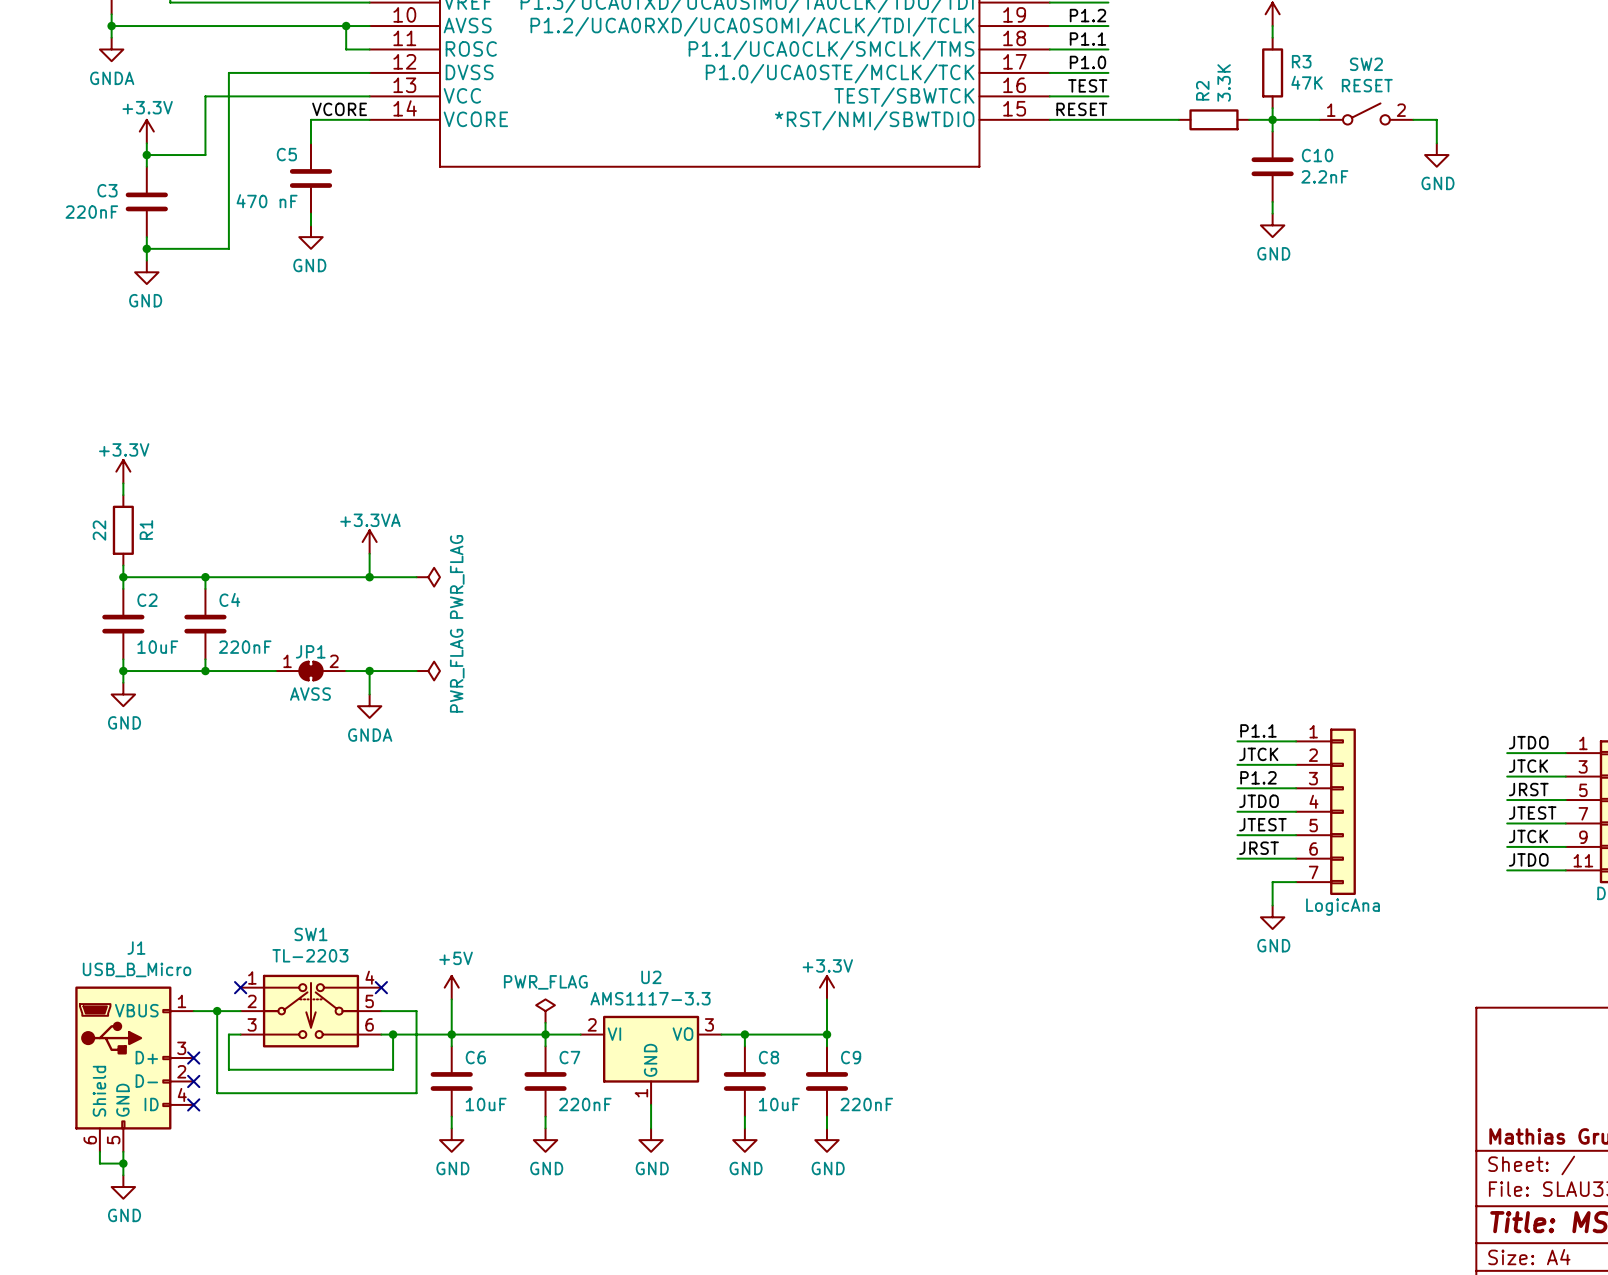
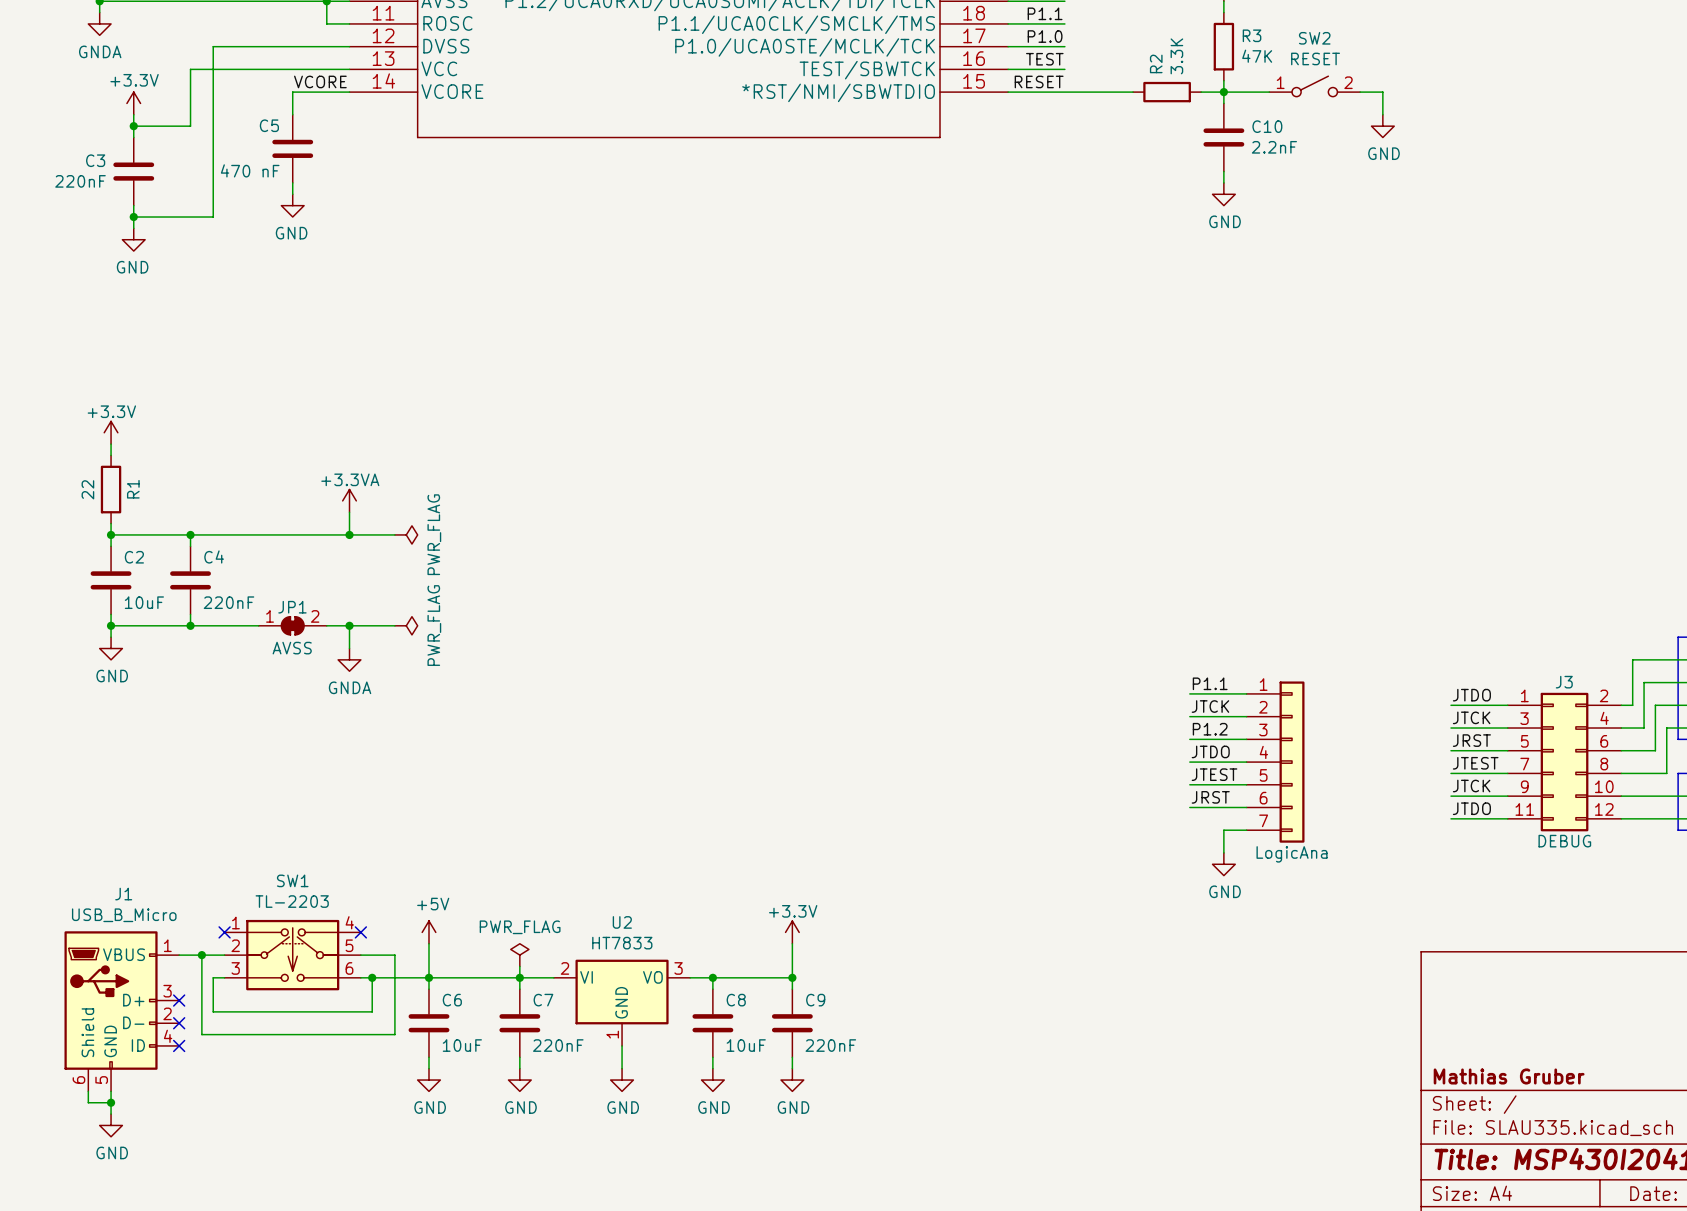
U2 value: AMS1117-3.3 (650, 998) -> HT7833 (622, 943)

